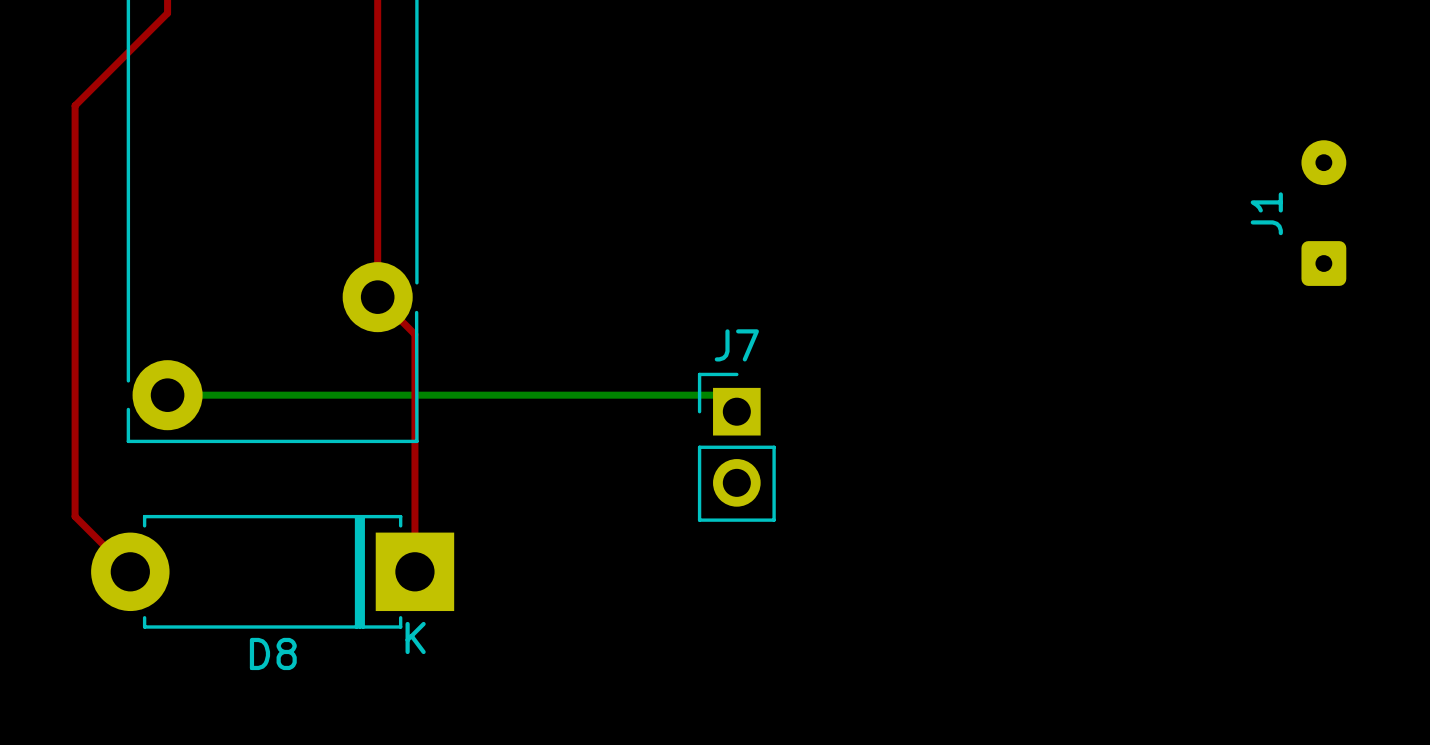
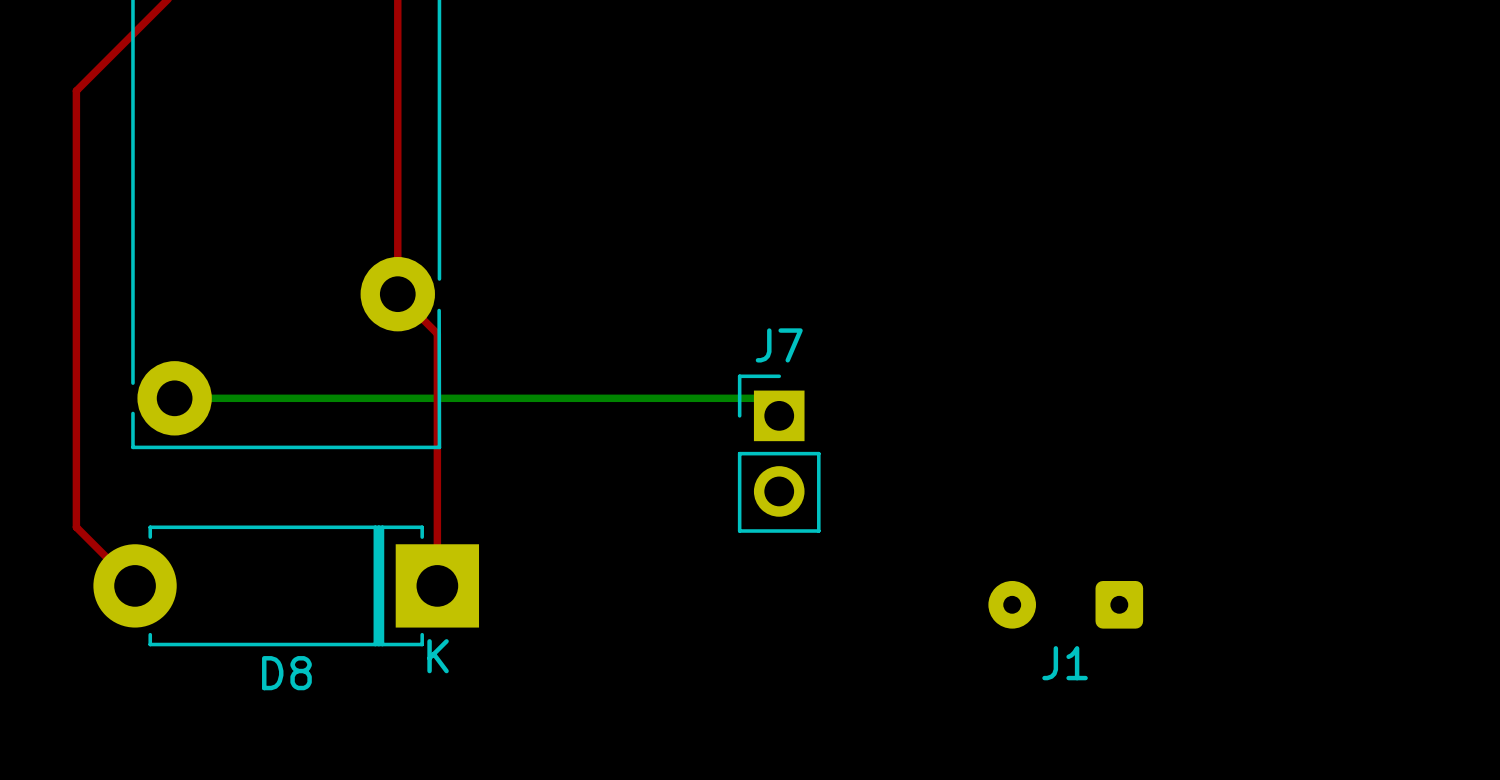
J1 rotation: 0° (1323, 213) -> 90° counterclockwise (1065, 604)
J1 position: (1323, 213) -> (1065, 604)

